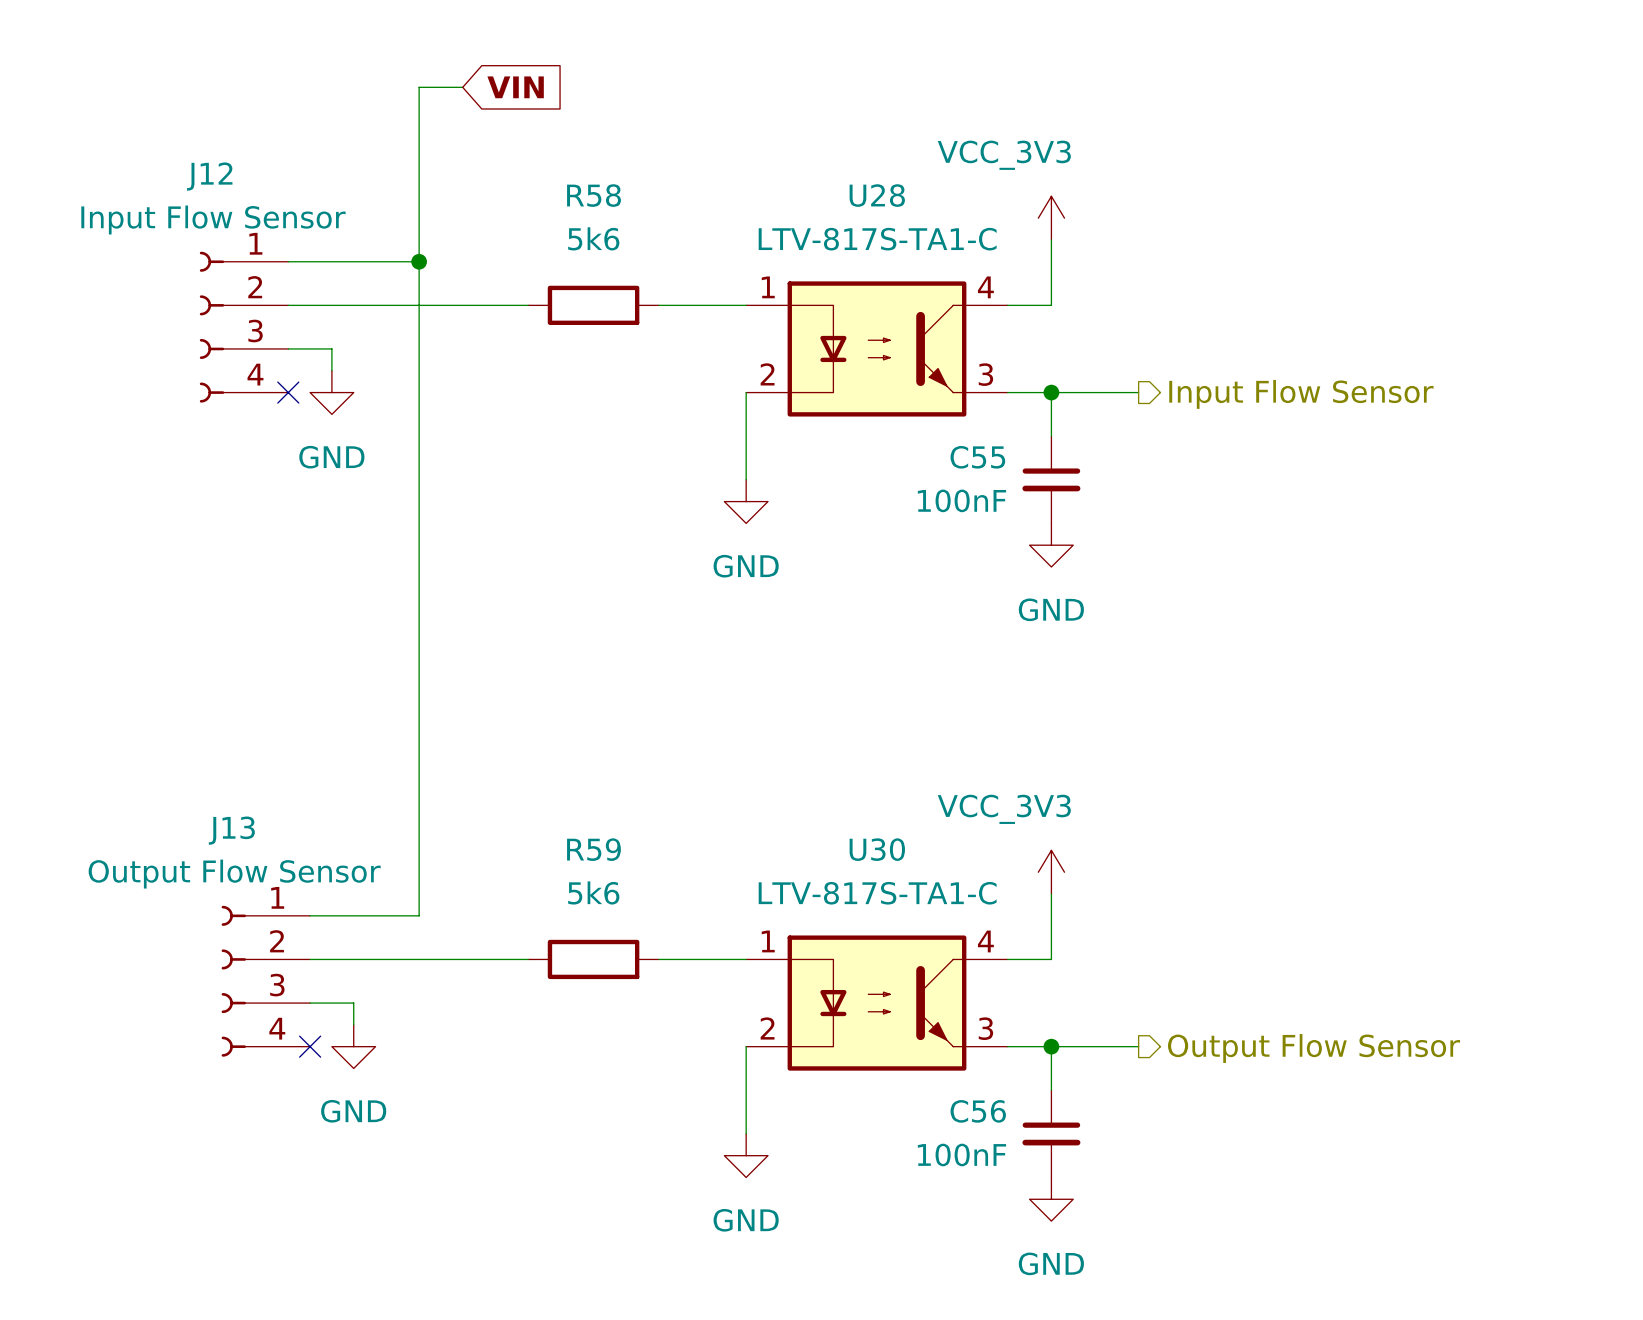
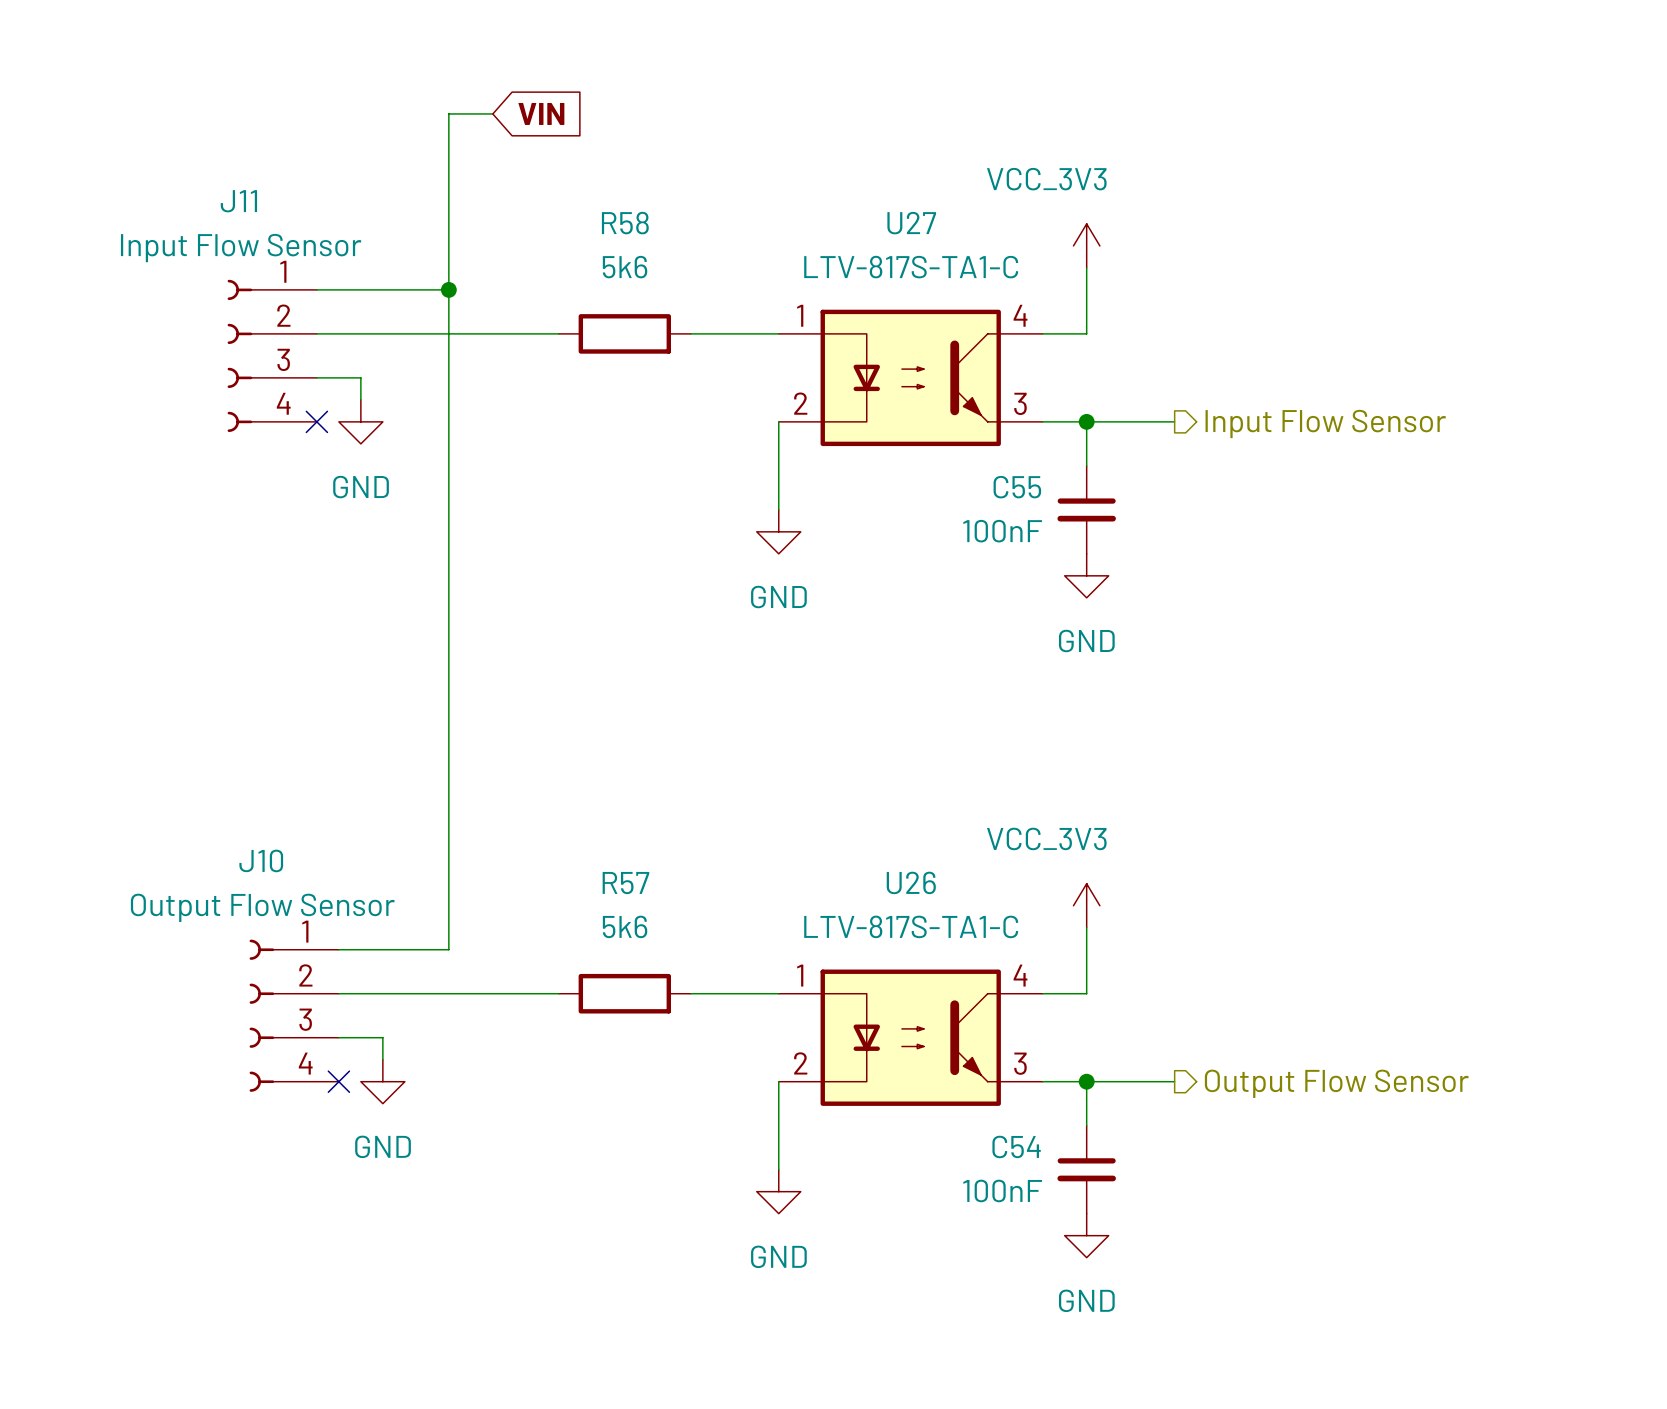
J12 name: J12 (209, 176) -> J11 (238, 201)
U28 name: U28 (877, 195) -> U27 (911, 223)
J13 name: J13 (231, 830) -> J10 (261, 860)
R59 name: R59 (593, 849) -> R57 (625, 883)
U30 name: U30 (877, 849) -> U26 (911, 882)
C56 name: C56 (978, 1111) -> C54 (1016, 1146)

